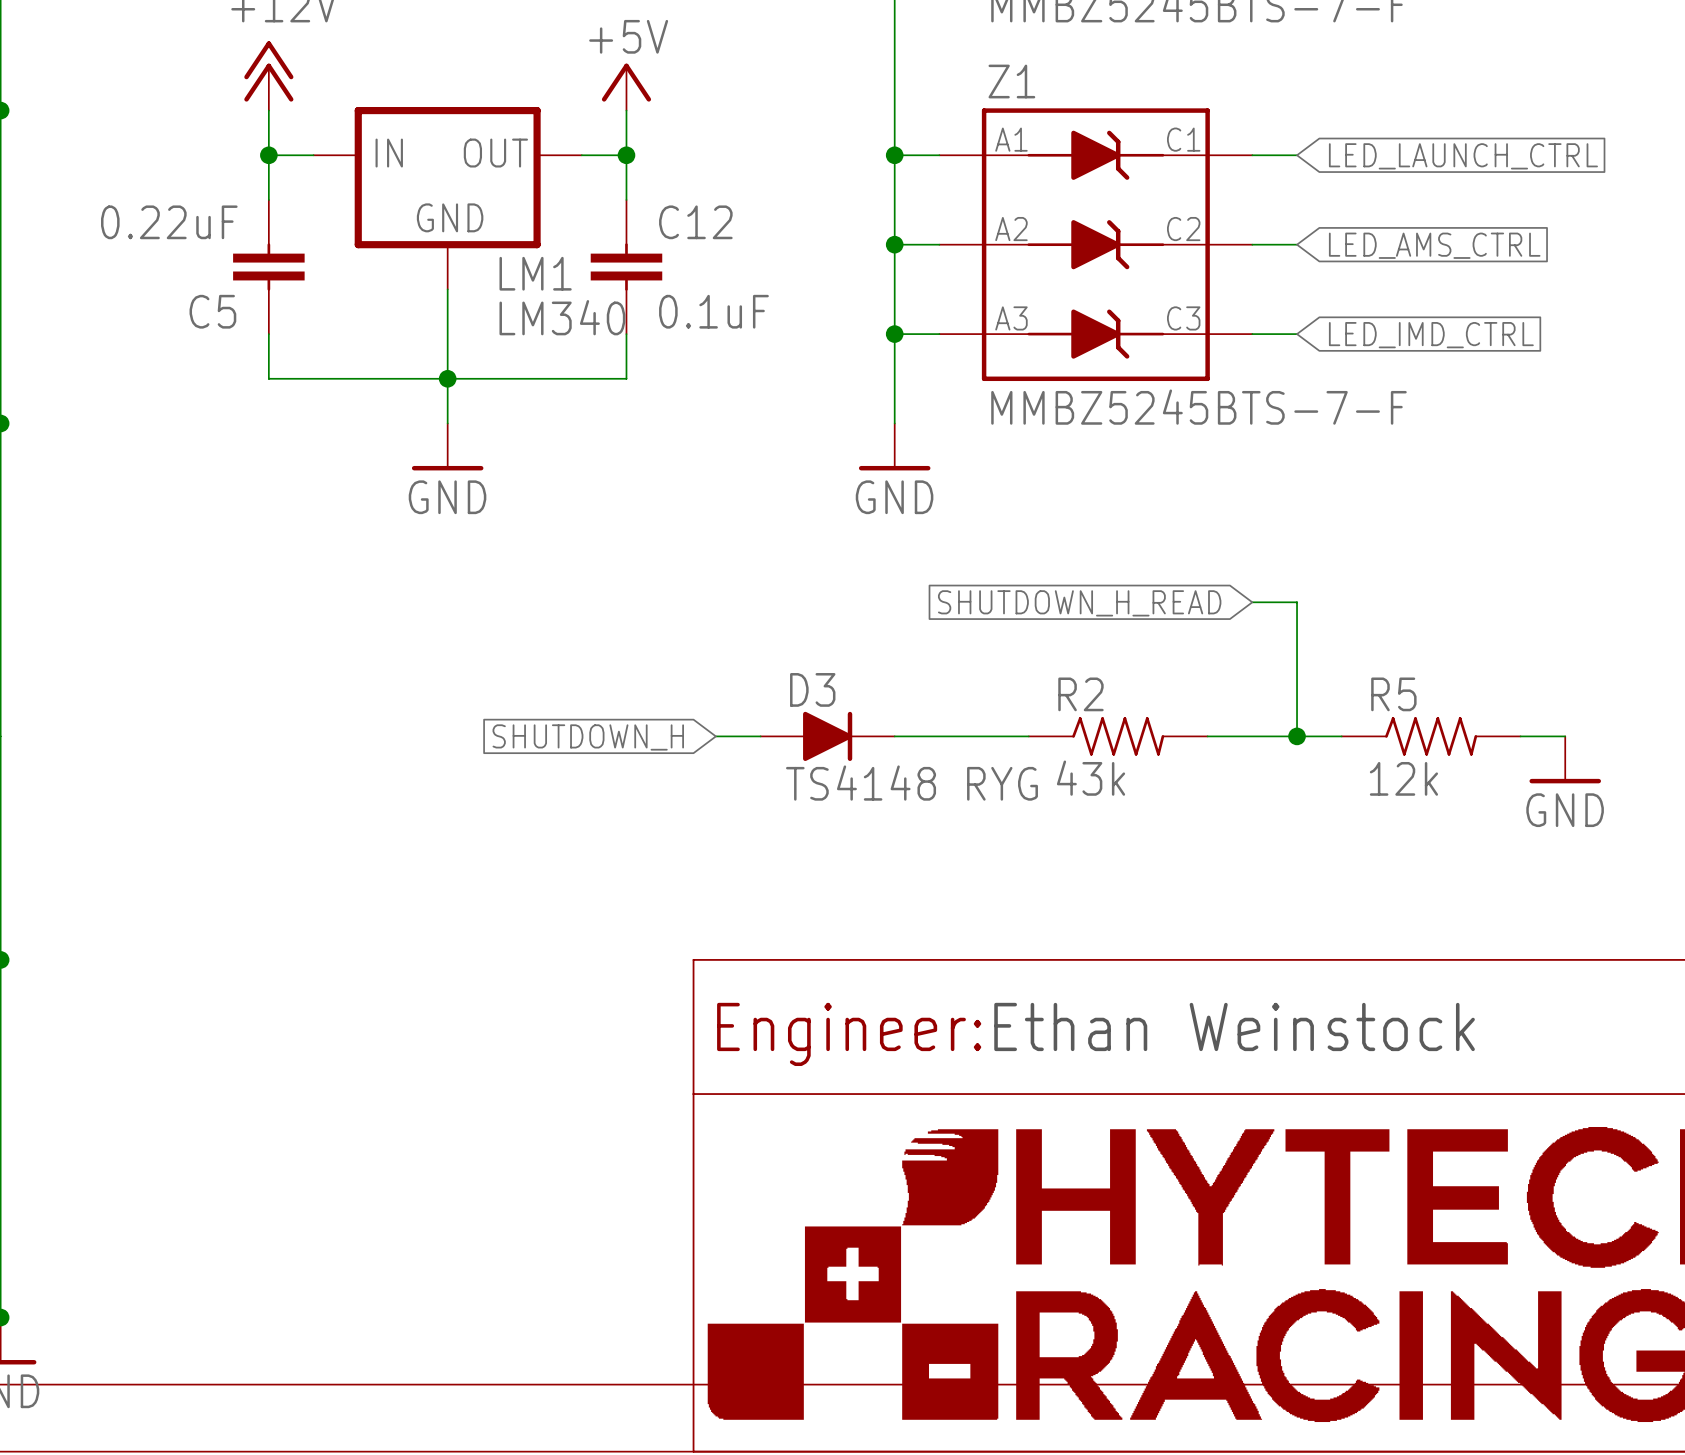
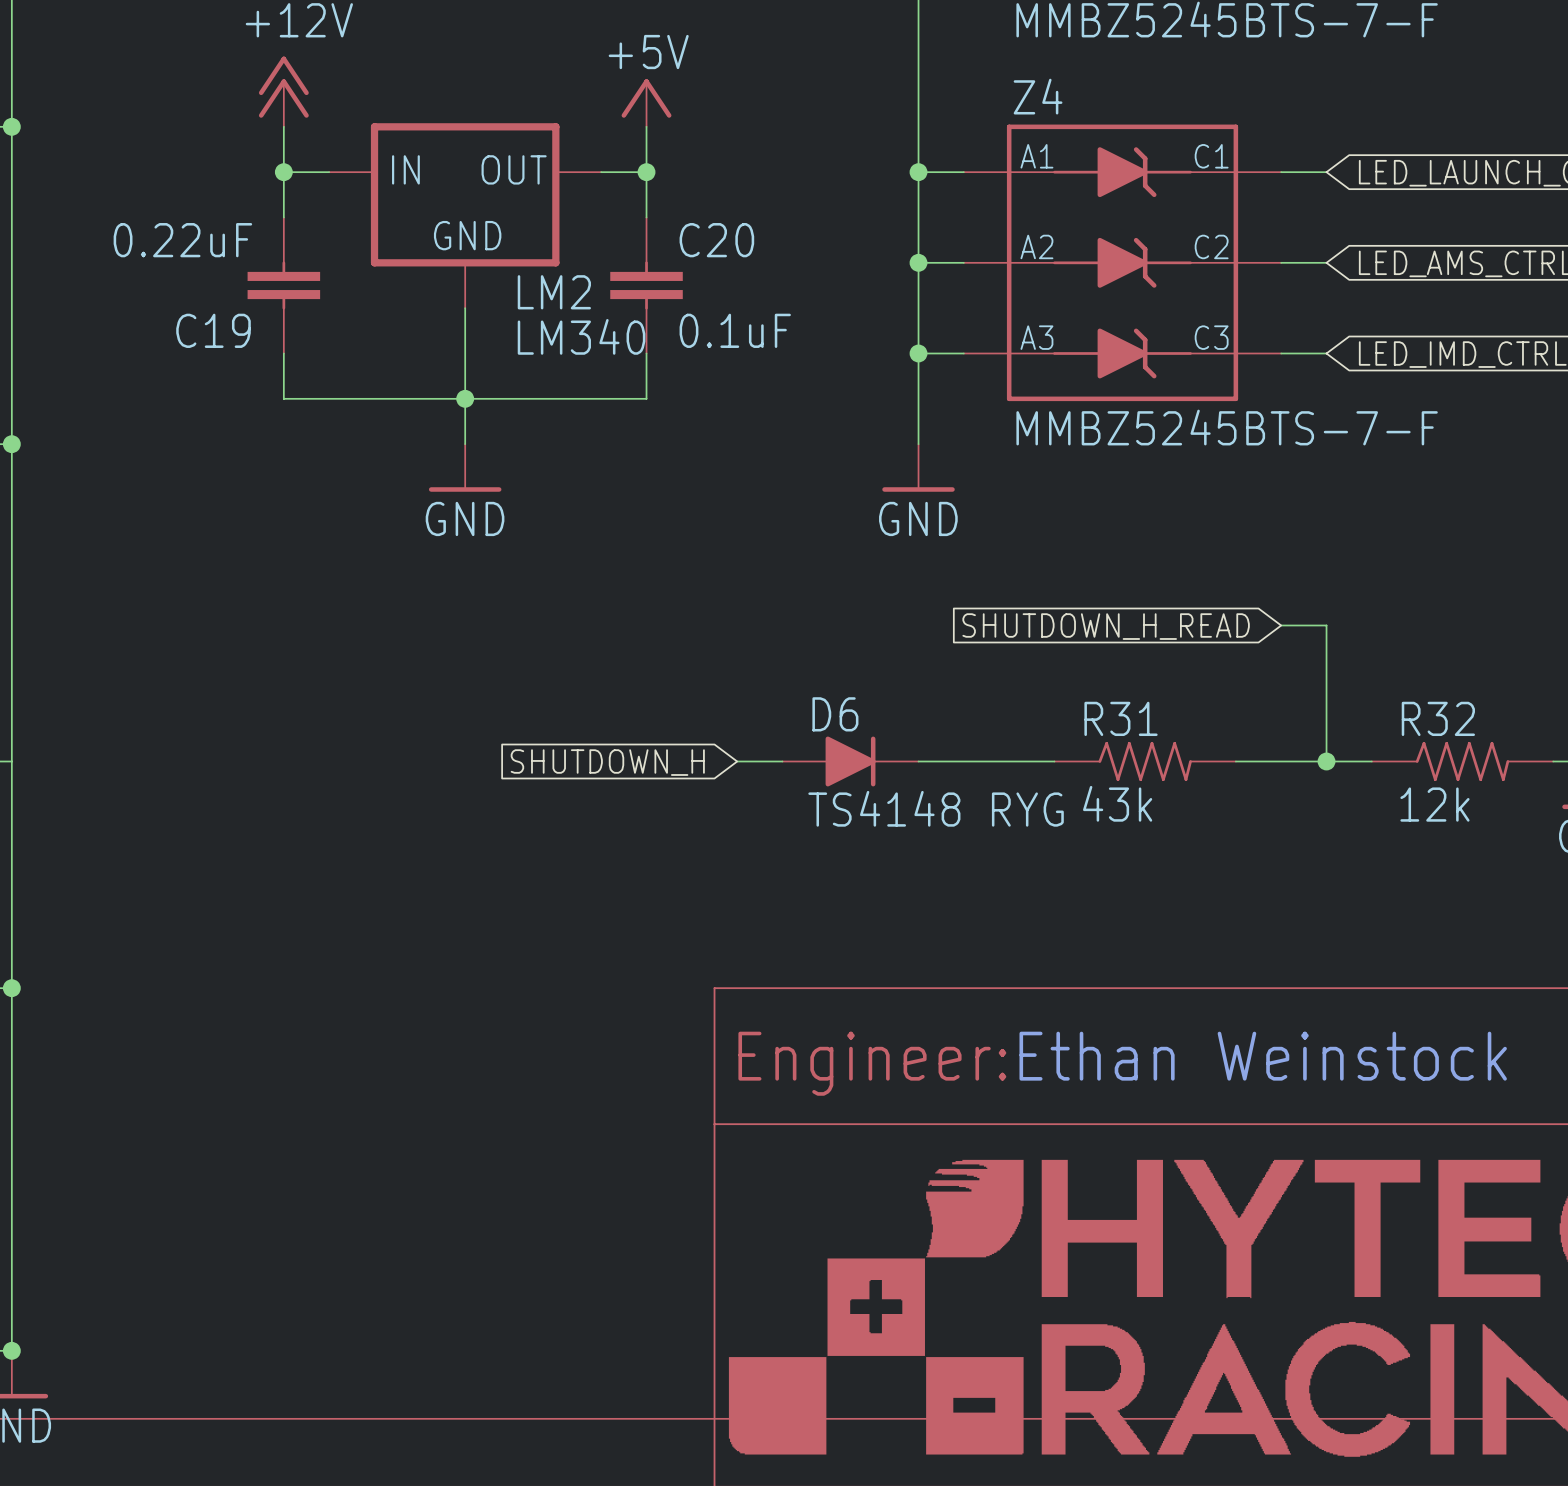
Z1 name: Z1 (1011, 81) -> Z4 (1038, 96)
C12 name: C12 (695, 222) -> C20 (716, 240)
LM1 name: LM1 (535, 273) -> LM2 (554, 292)
C5 name: C5 (212, 311) -> C19 (213, 330)
D3 name: D3 (812, 689) -> D6 (835, 714)
R2 name: R2 (1080, 694) -> R31 (1121, 718)
R5 name: R5 (1393, 694) -> R32 (1438, 718)

